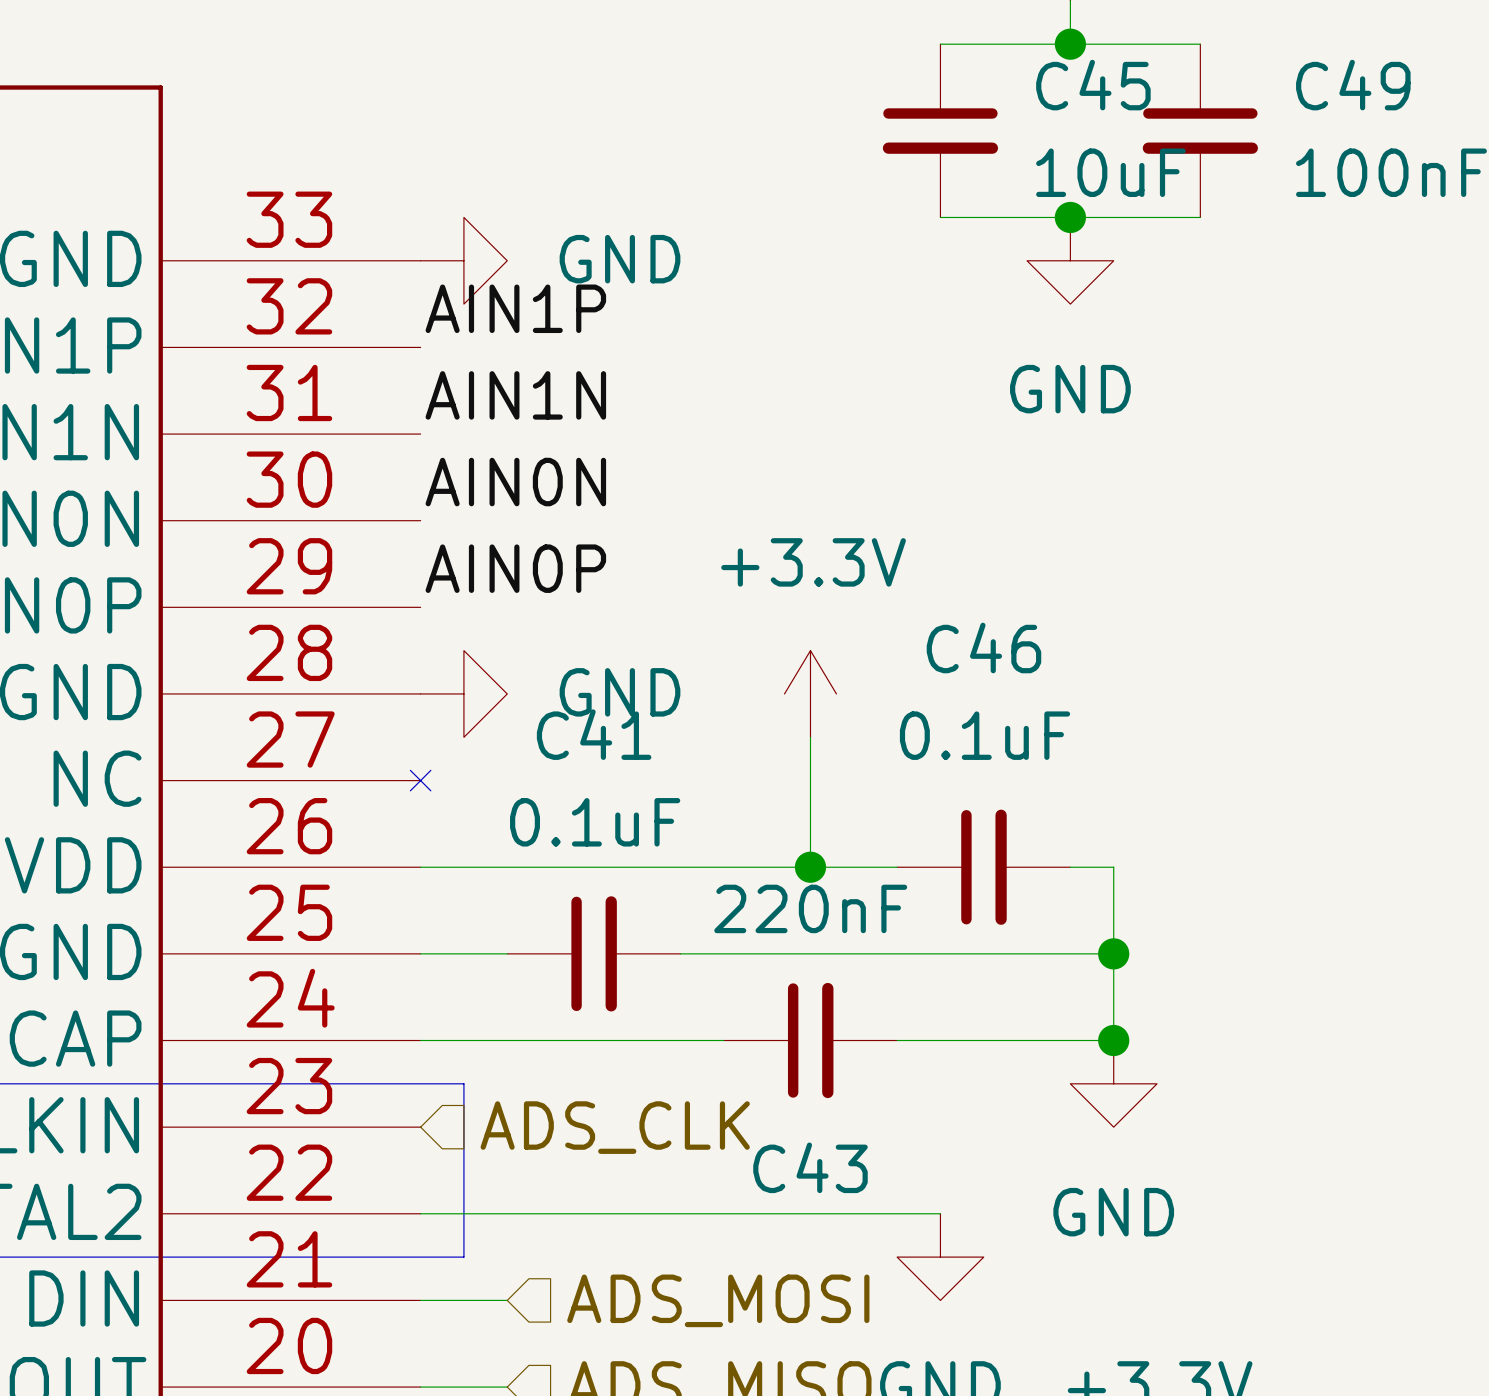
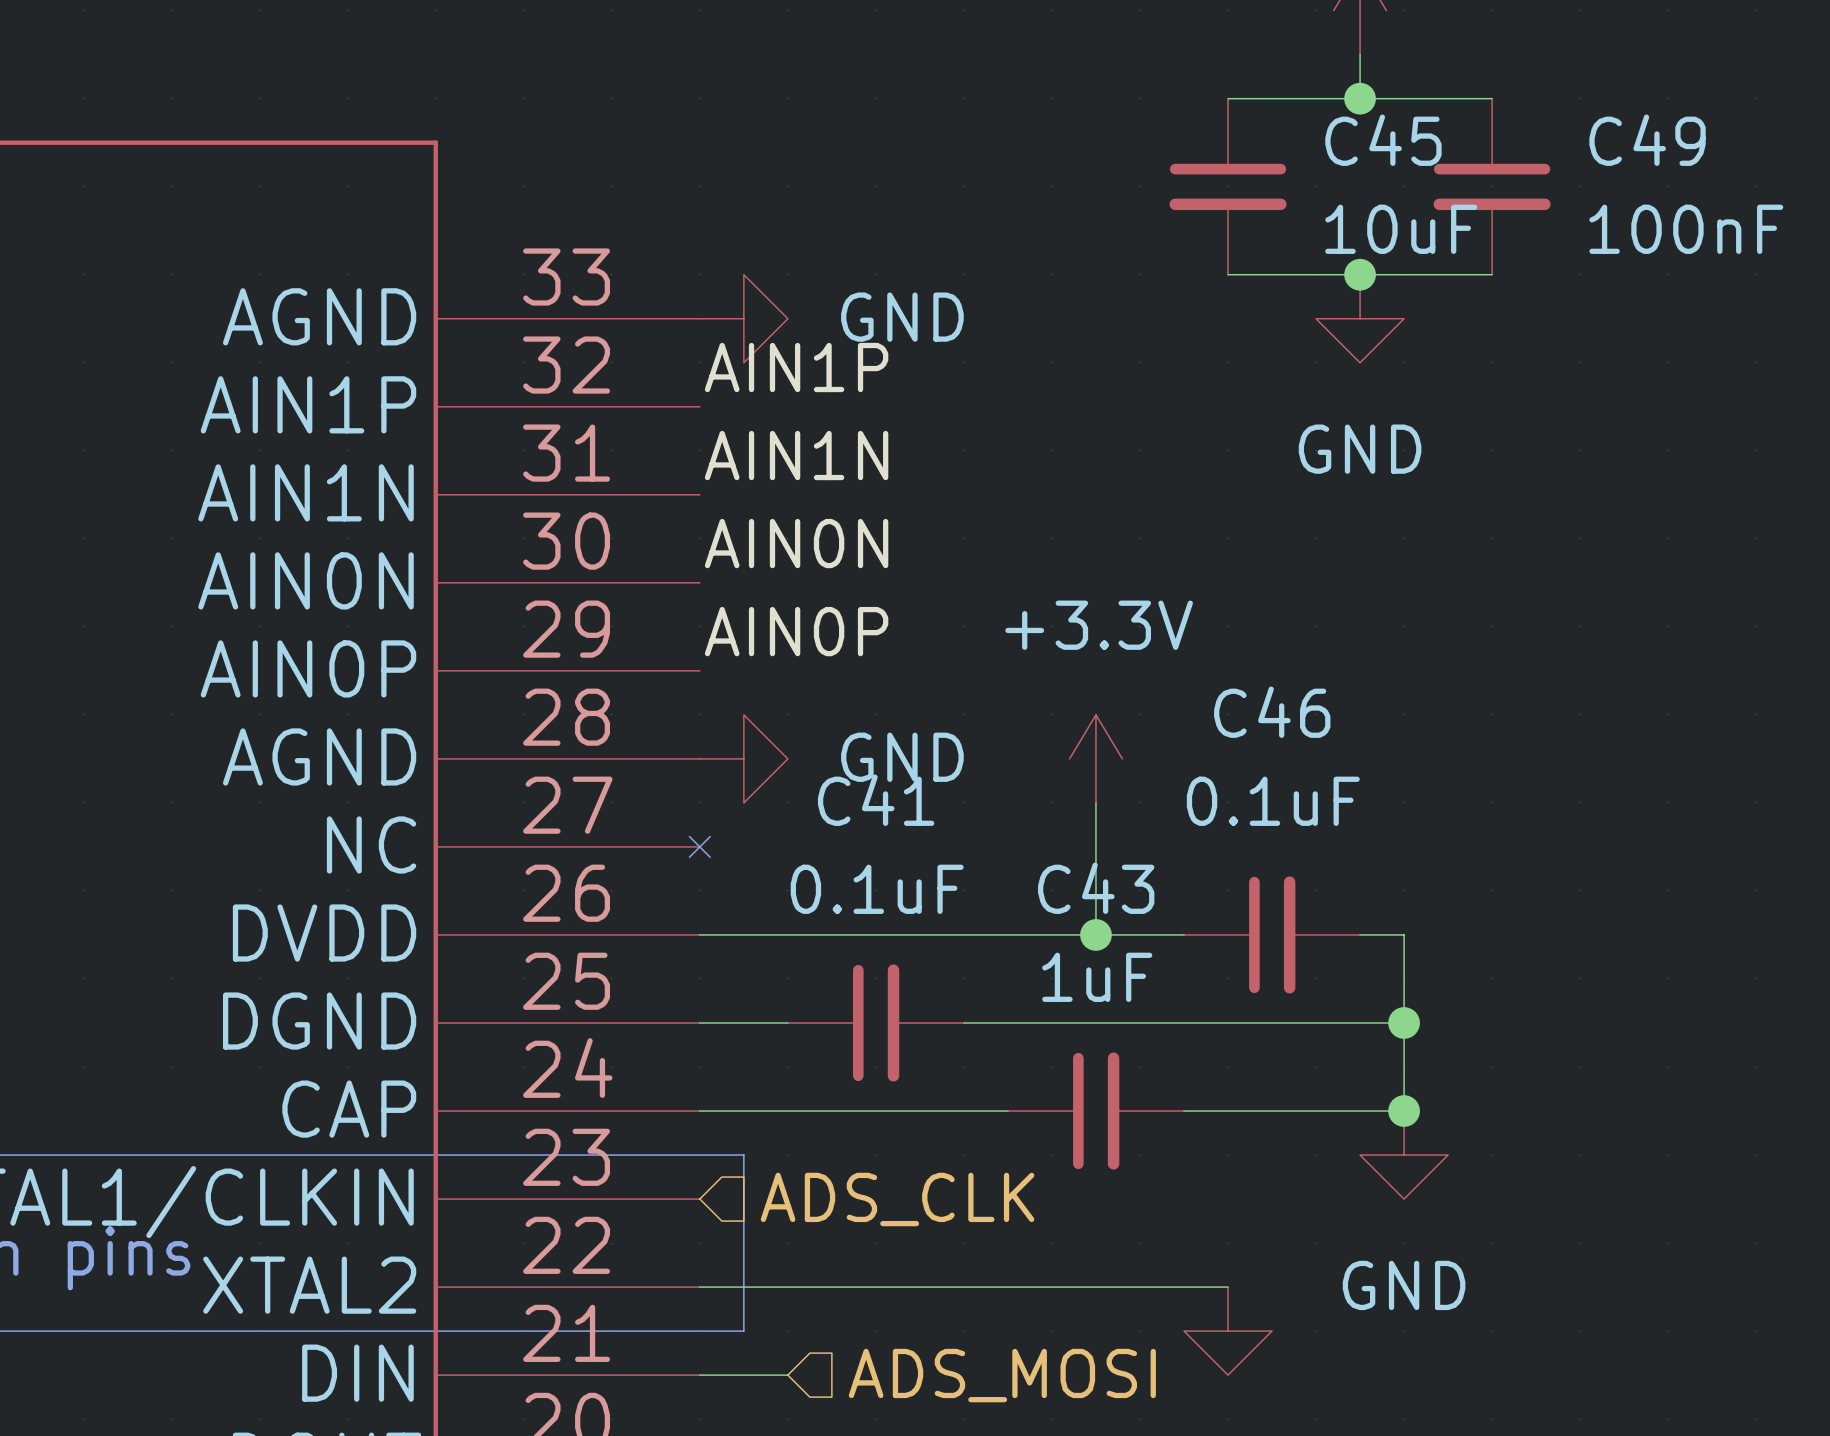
C43 value: 220nF (810, 908) -> 1uF (1097, 977)
C43 name position: C43 (810, 1167) -> C43 (1096, 888)

